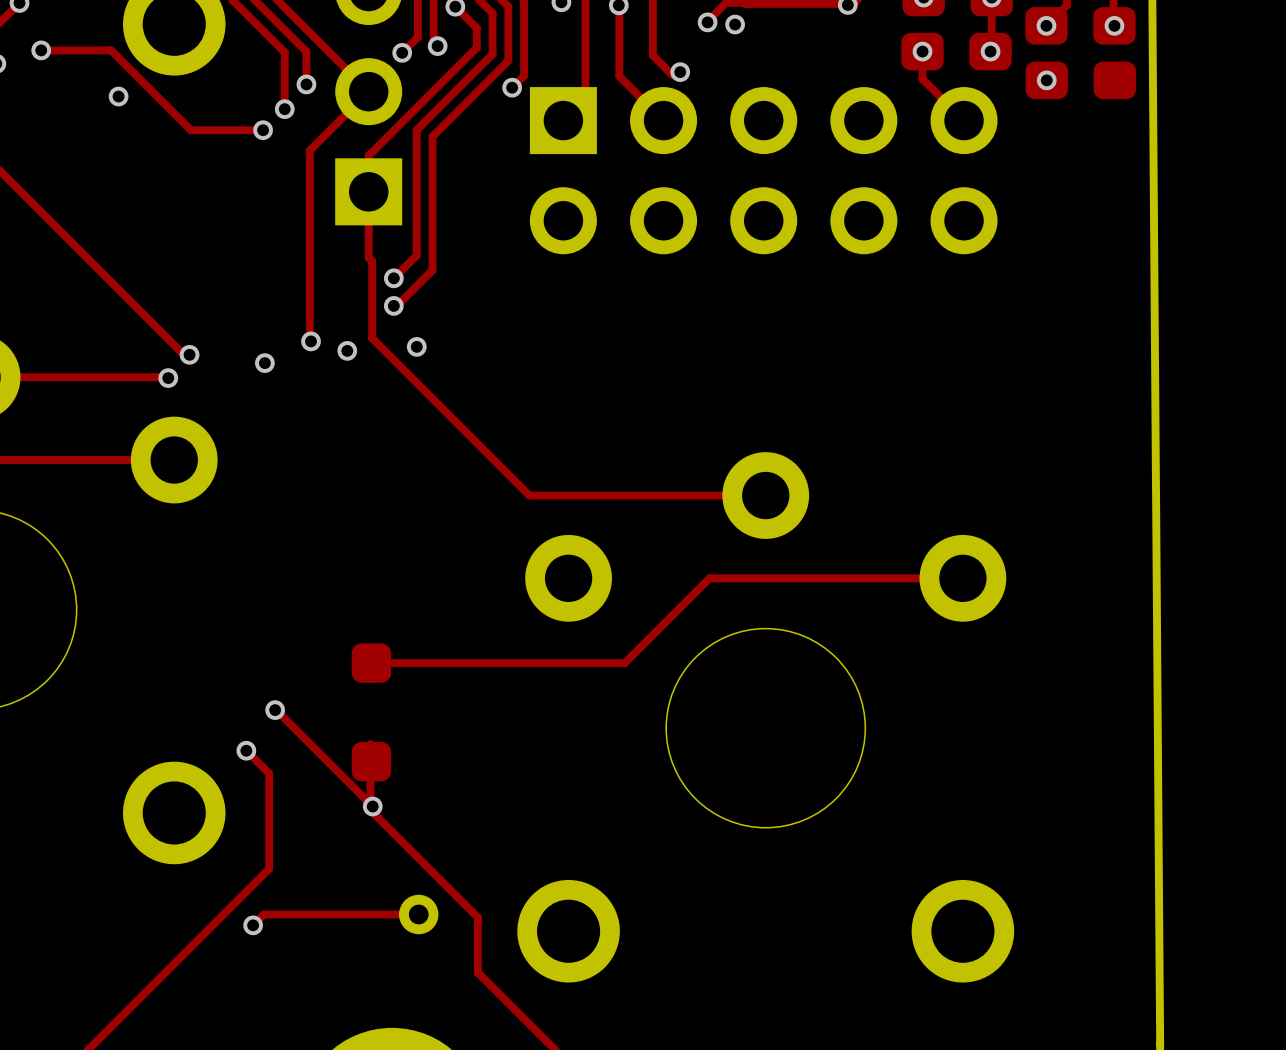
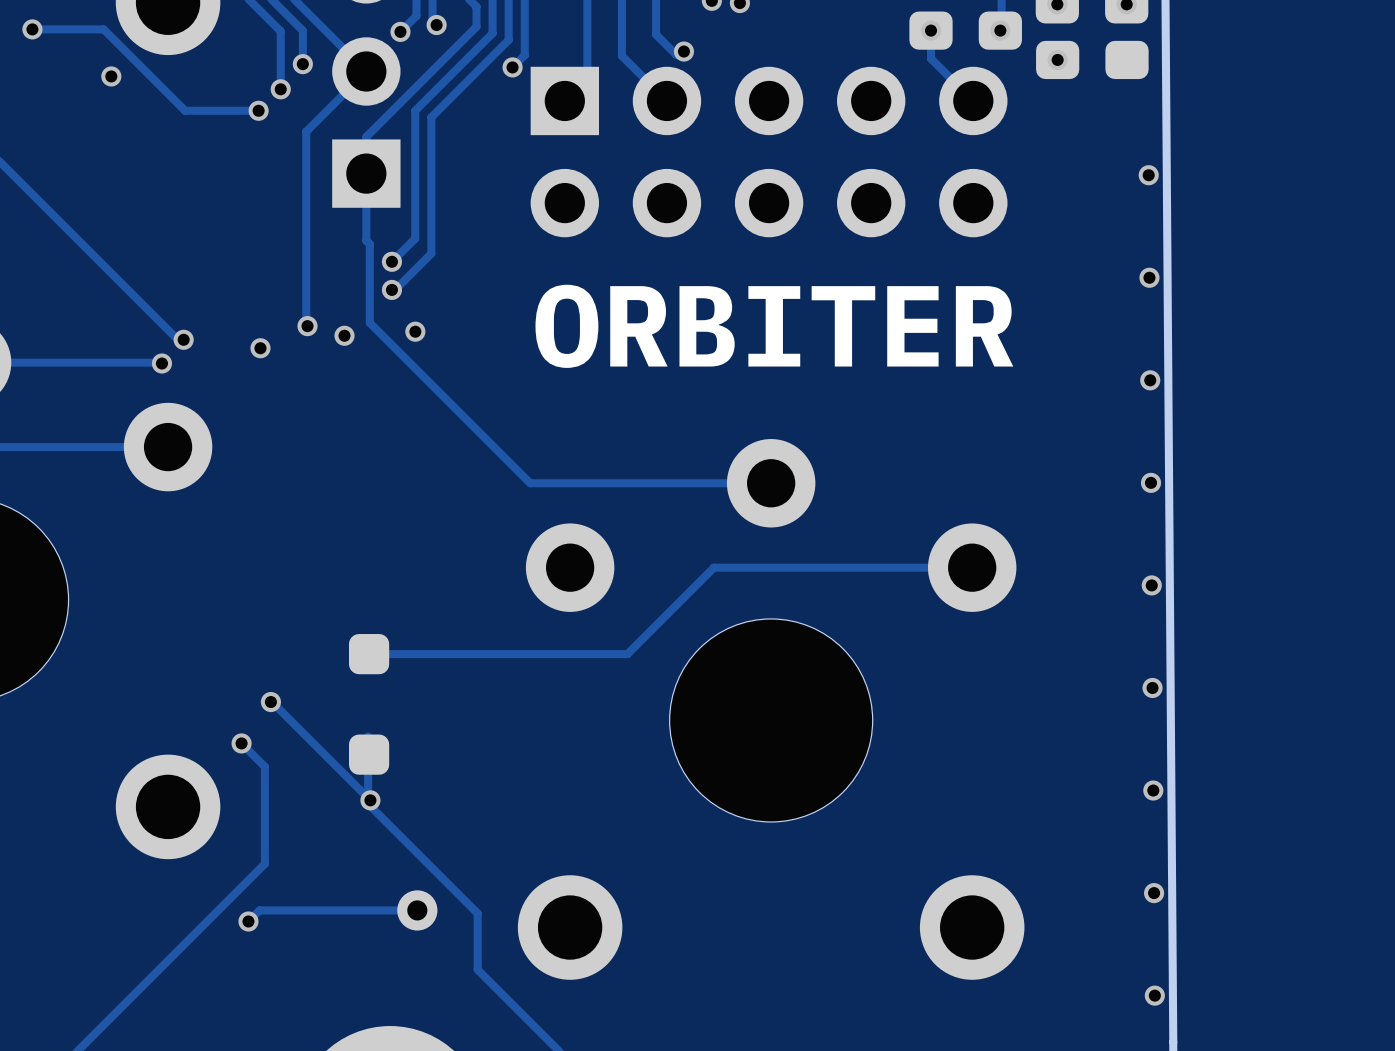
via: none -> (1148, 175)
via: none -> (1149, 277)
text: none -> ORBITER (774, 326)
via: none -> (1150, 380)
via: none -> (1151, 482)
via: none -> (1151, 585)
via: none -> (1152, 687)
via: none -> (1153, 790)
via: none -> (1154, 893)
via: none -> (1154, 995)

